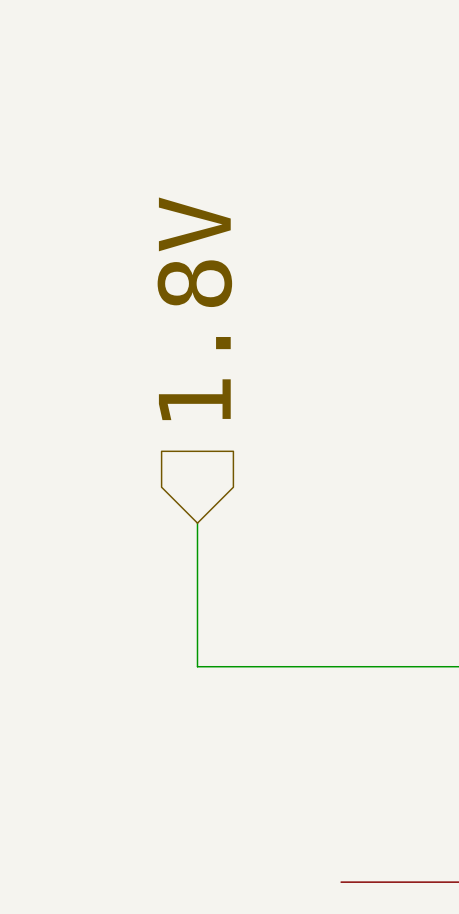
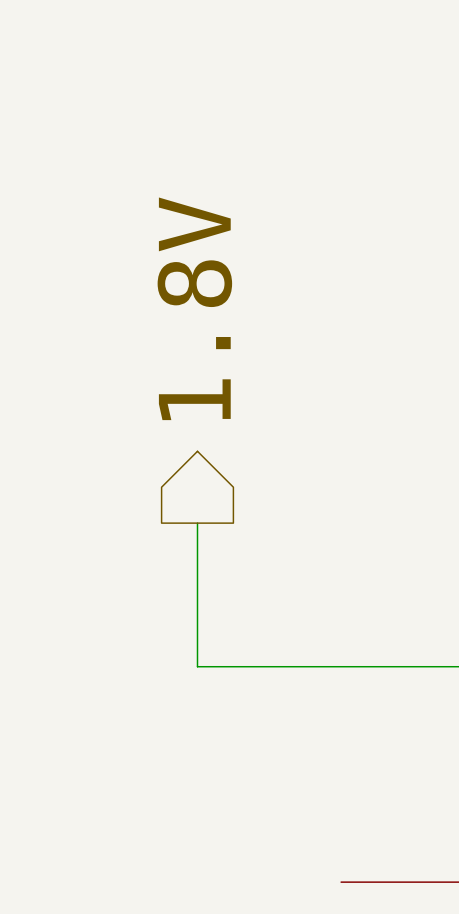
hierarchical label shape: input (194, 308) -> output (194, 308)

